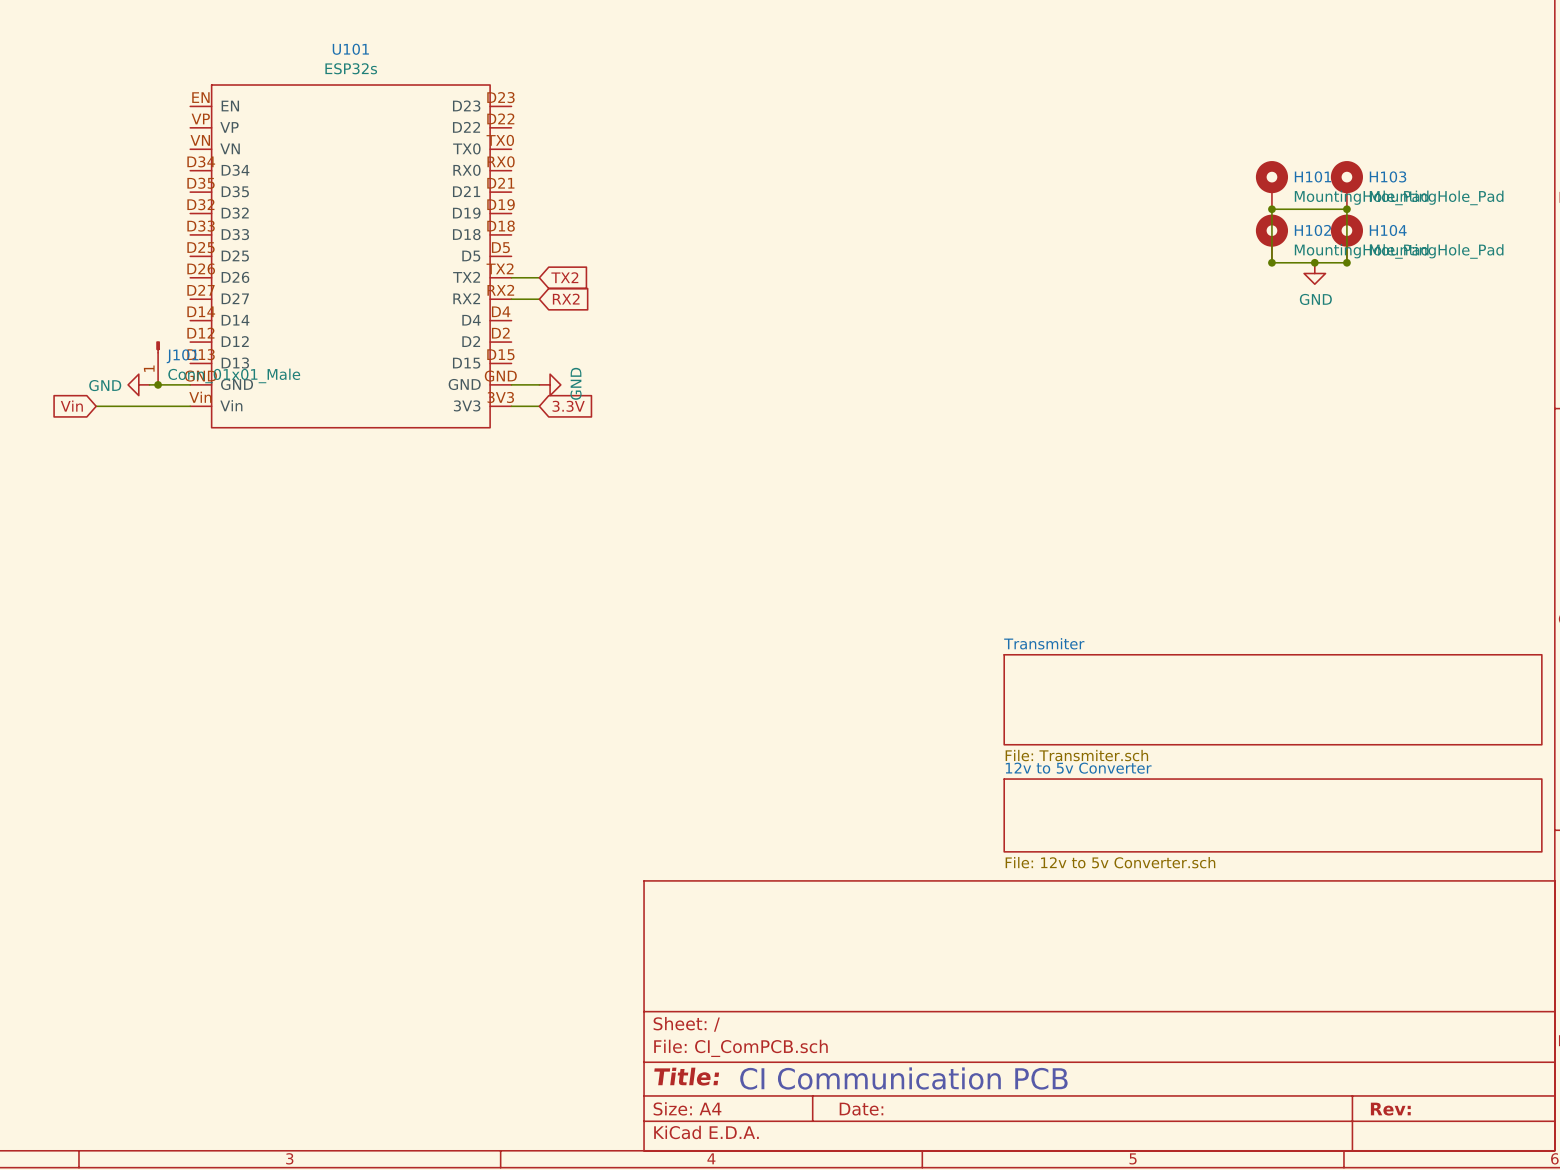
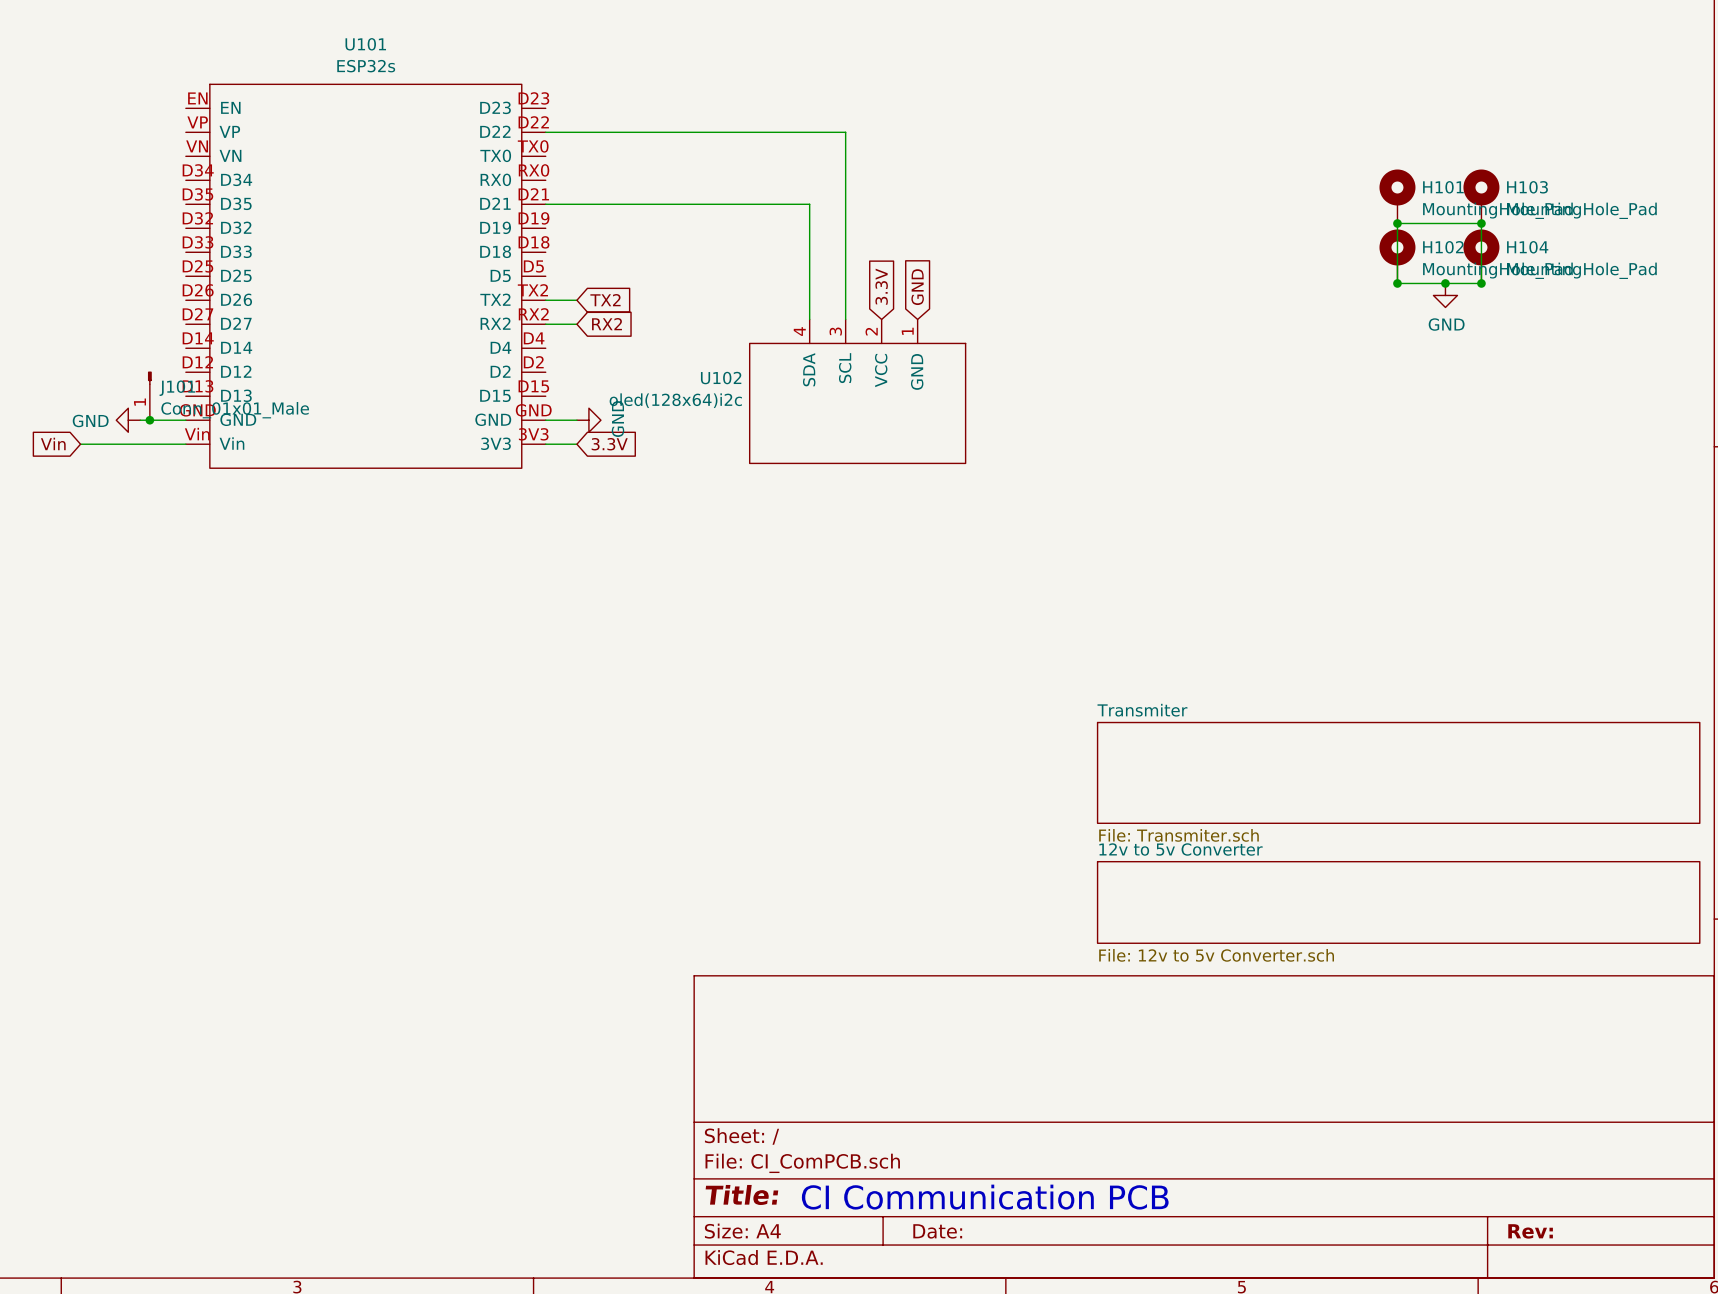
wire: none -> (545, 132) (845, 132) (845, 319)
wire: none -> (545, 204) (809, 204) (809, 319)
global label: none -> 3.3V (881, 286)
global label: none -> GND (917, 287)
U102: none -> oled(128x64)i2c (857, 391)

